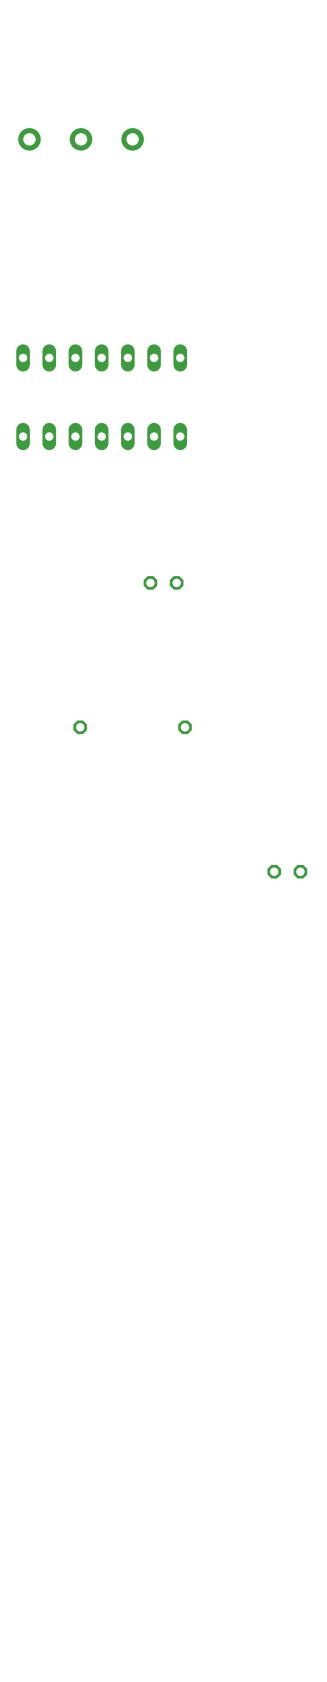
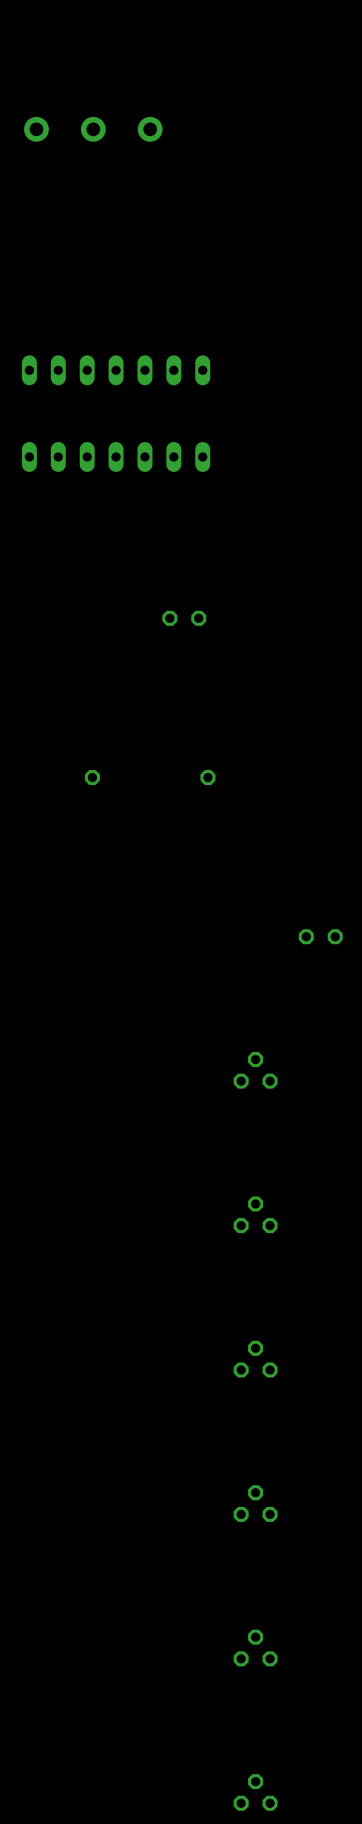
part: none -> (255, 1070)
part: none -> (255, 1214)
part: none -> (255, 1359)
part: none -> (255, 1503)
part: none -> (255, 1648)
part: none -> (255, 1792)

